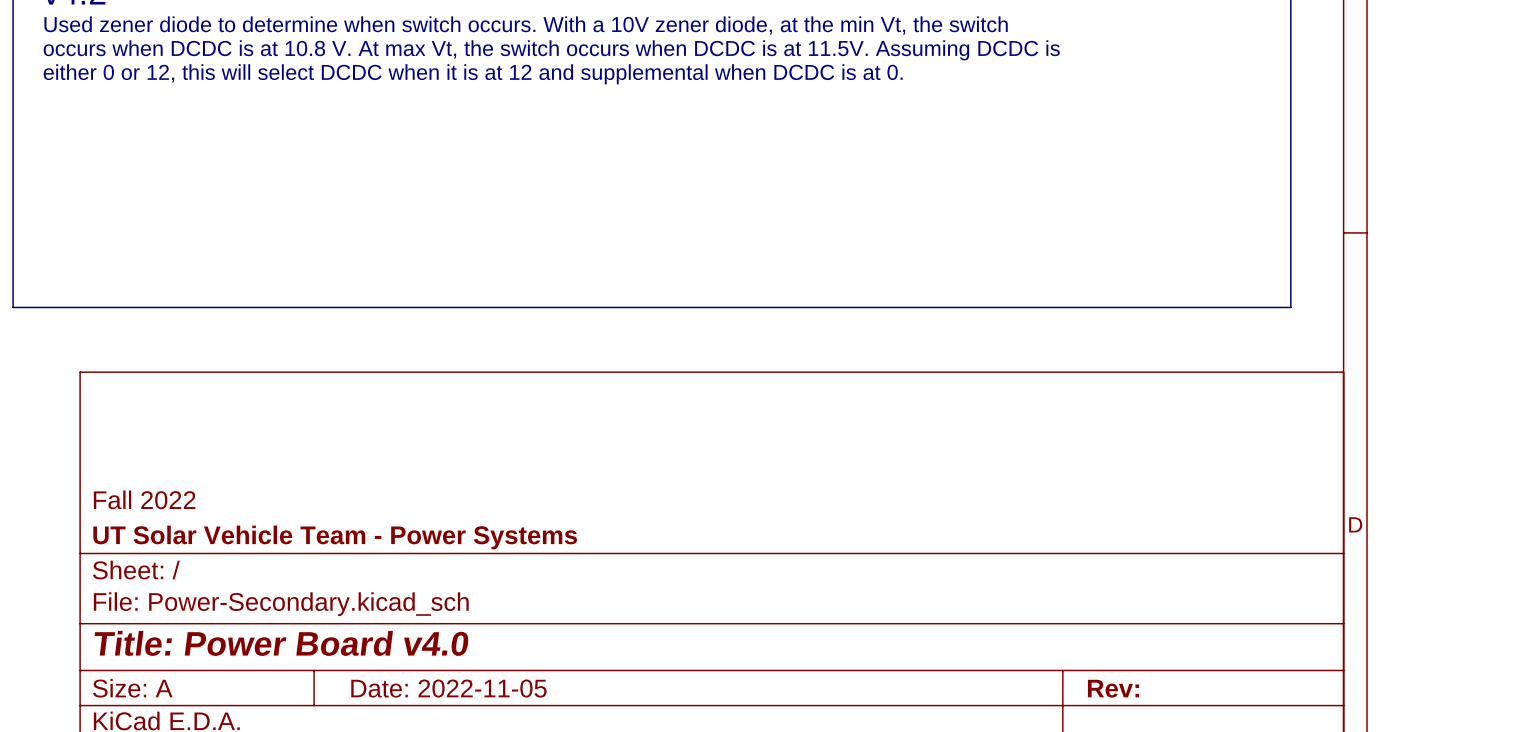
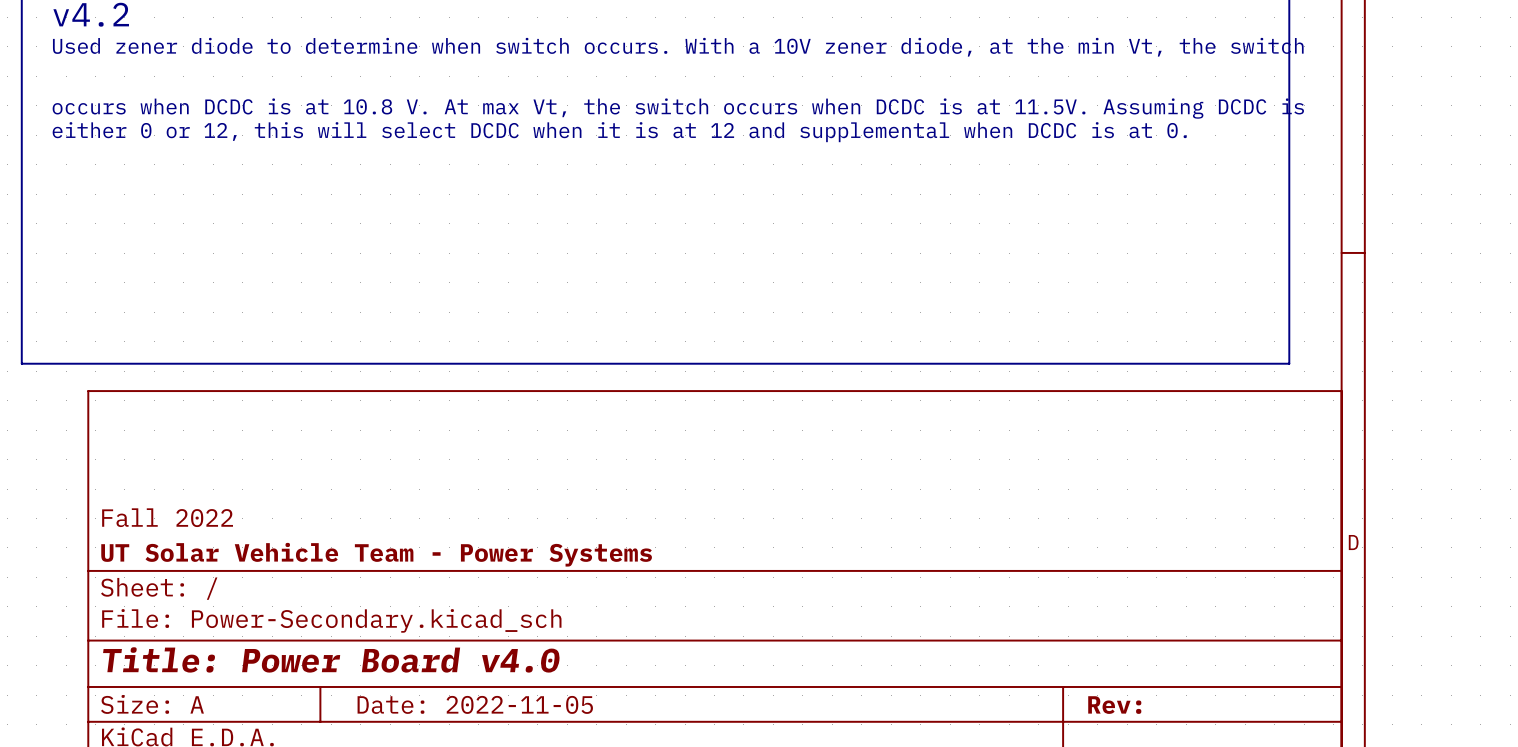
text position: occurs when DCDC is at 10.8 V. At max Vt, the switch occurs when DCDC is at 11.5V. Assuming DCDC is (551, 50) -> occurs when DCDC is at 10.8 V. At max Vt, the switch occurs when DCDC is at 11.5V. Assuming DCDC is (678, 108)
text position: either 0 or 12, this will select DCDC when it is at 12 and supplemental when DCDC is at 0. (473, 74) -> either 0 or 12, this will select DCDC when it is at 12 and supplemental when DCDC is at 0. (619, 132)
line: (13, 307) (1290, 307) -> (21, 326) (21, 363) (1289, 363) (1289, 326)

